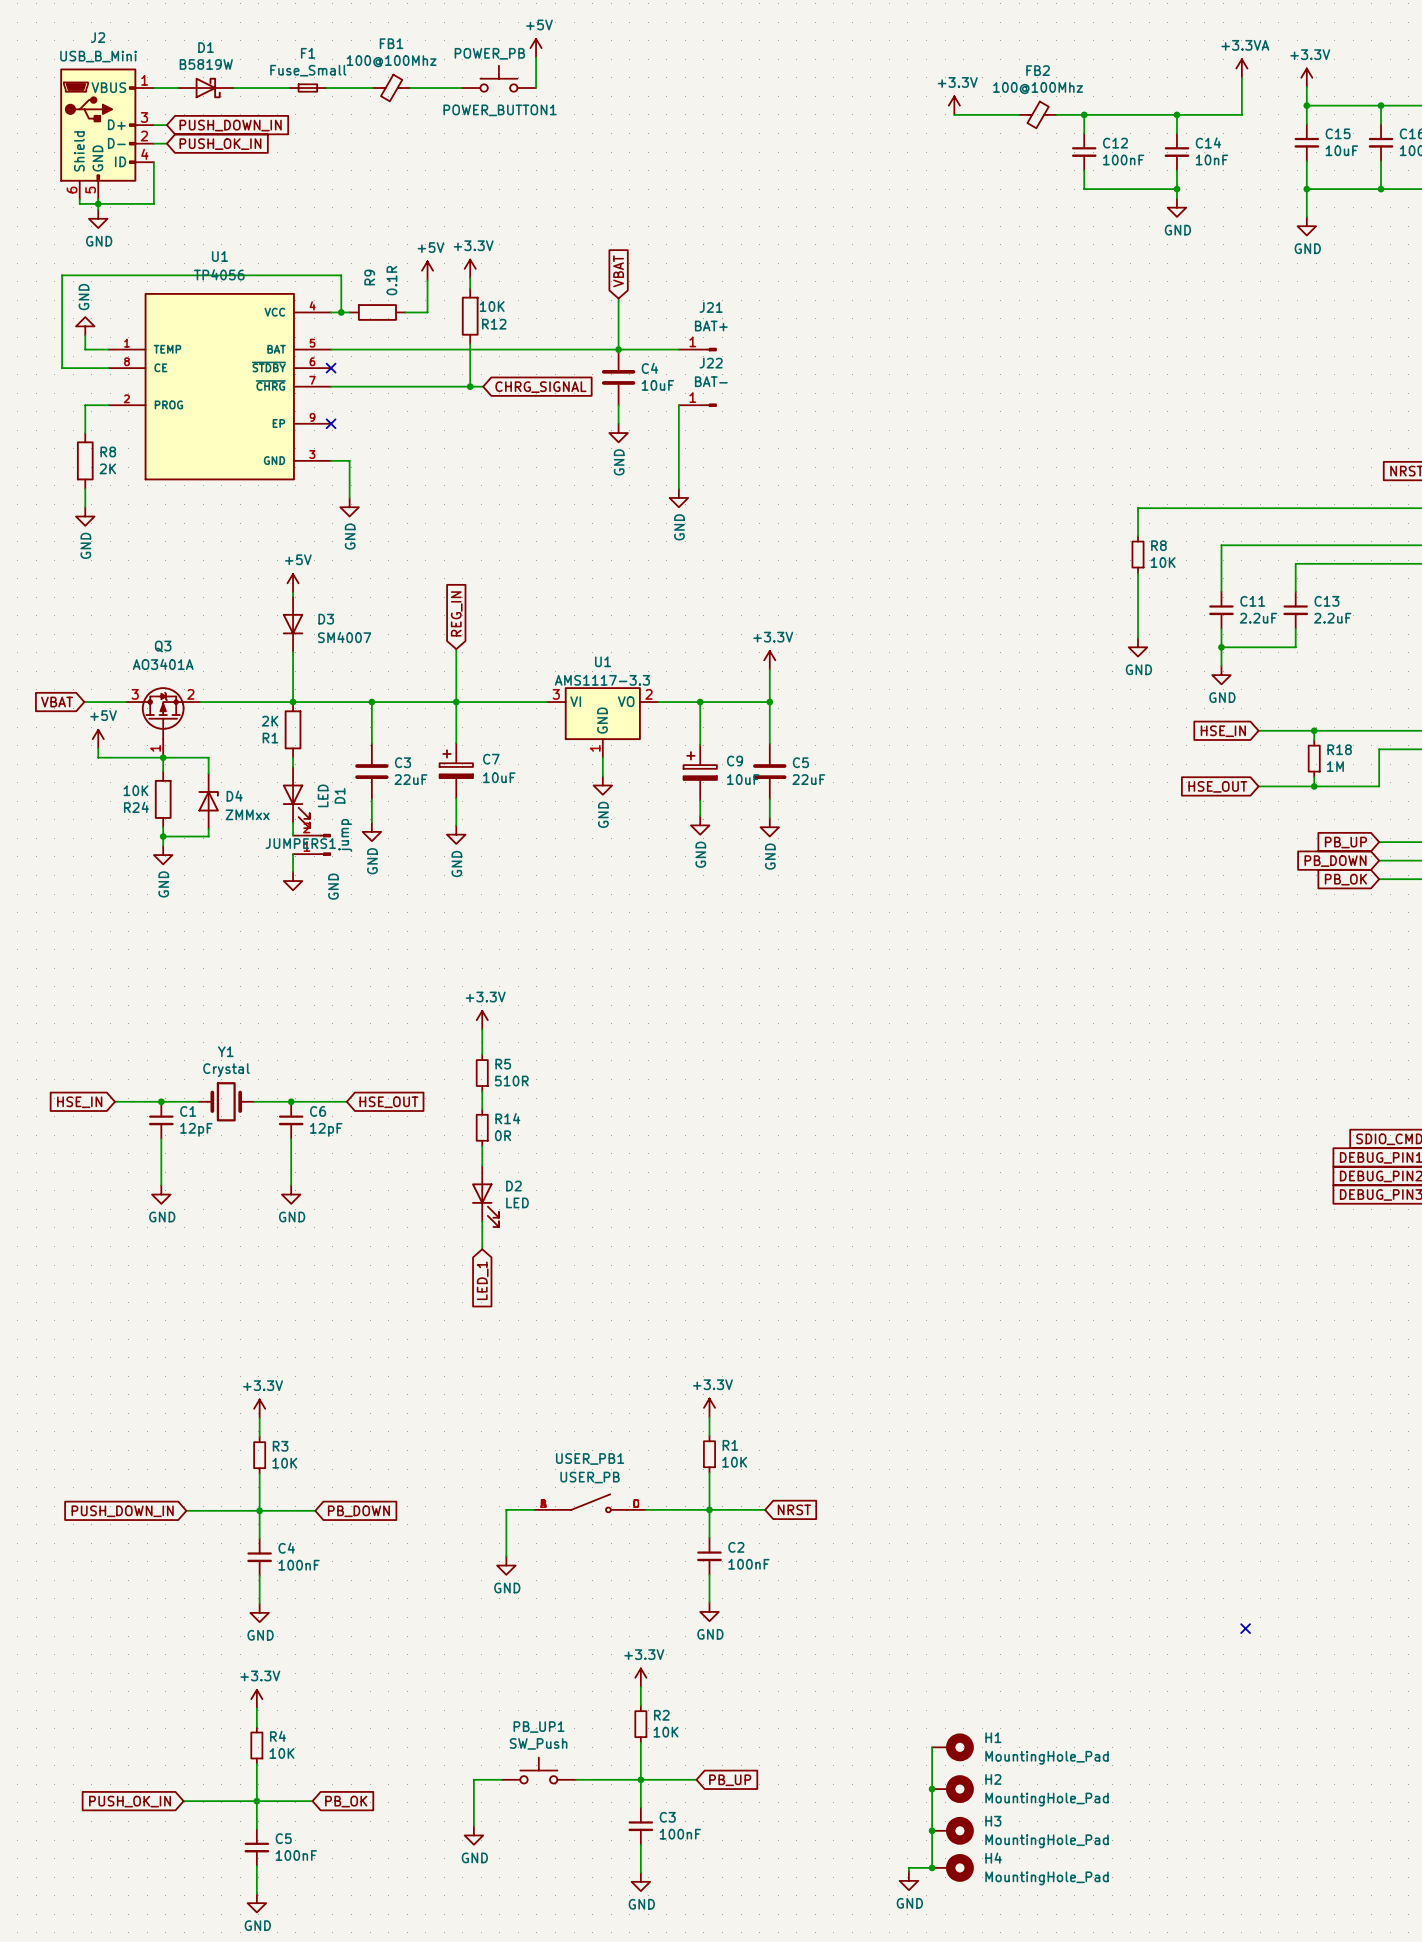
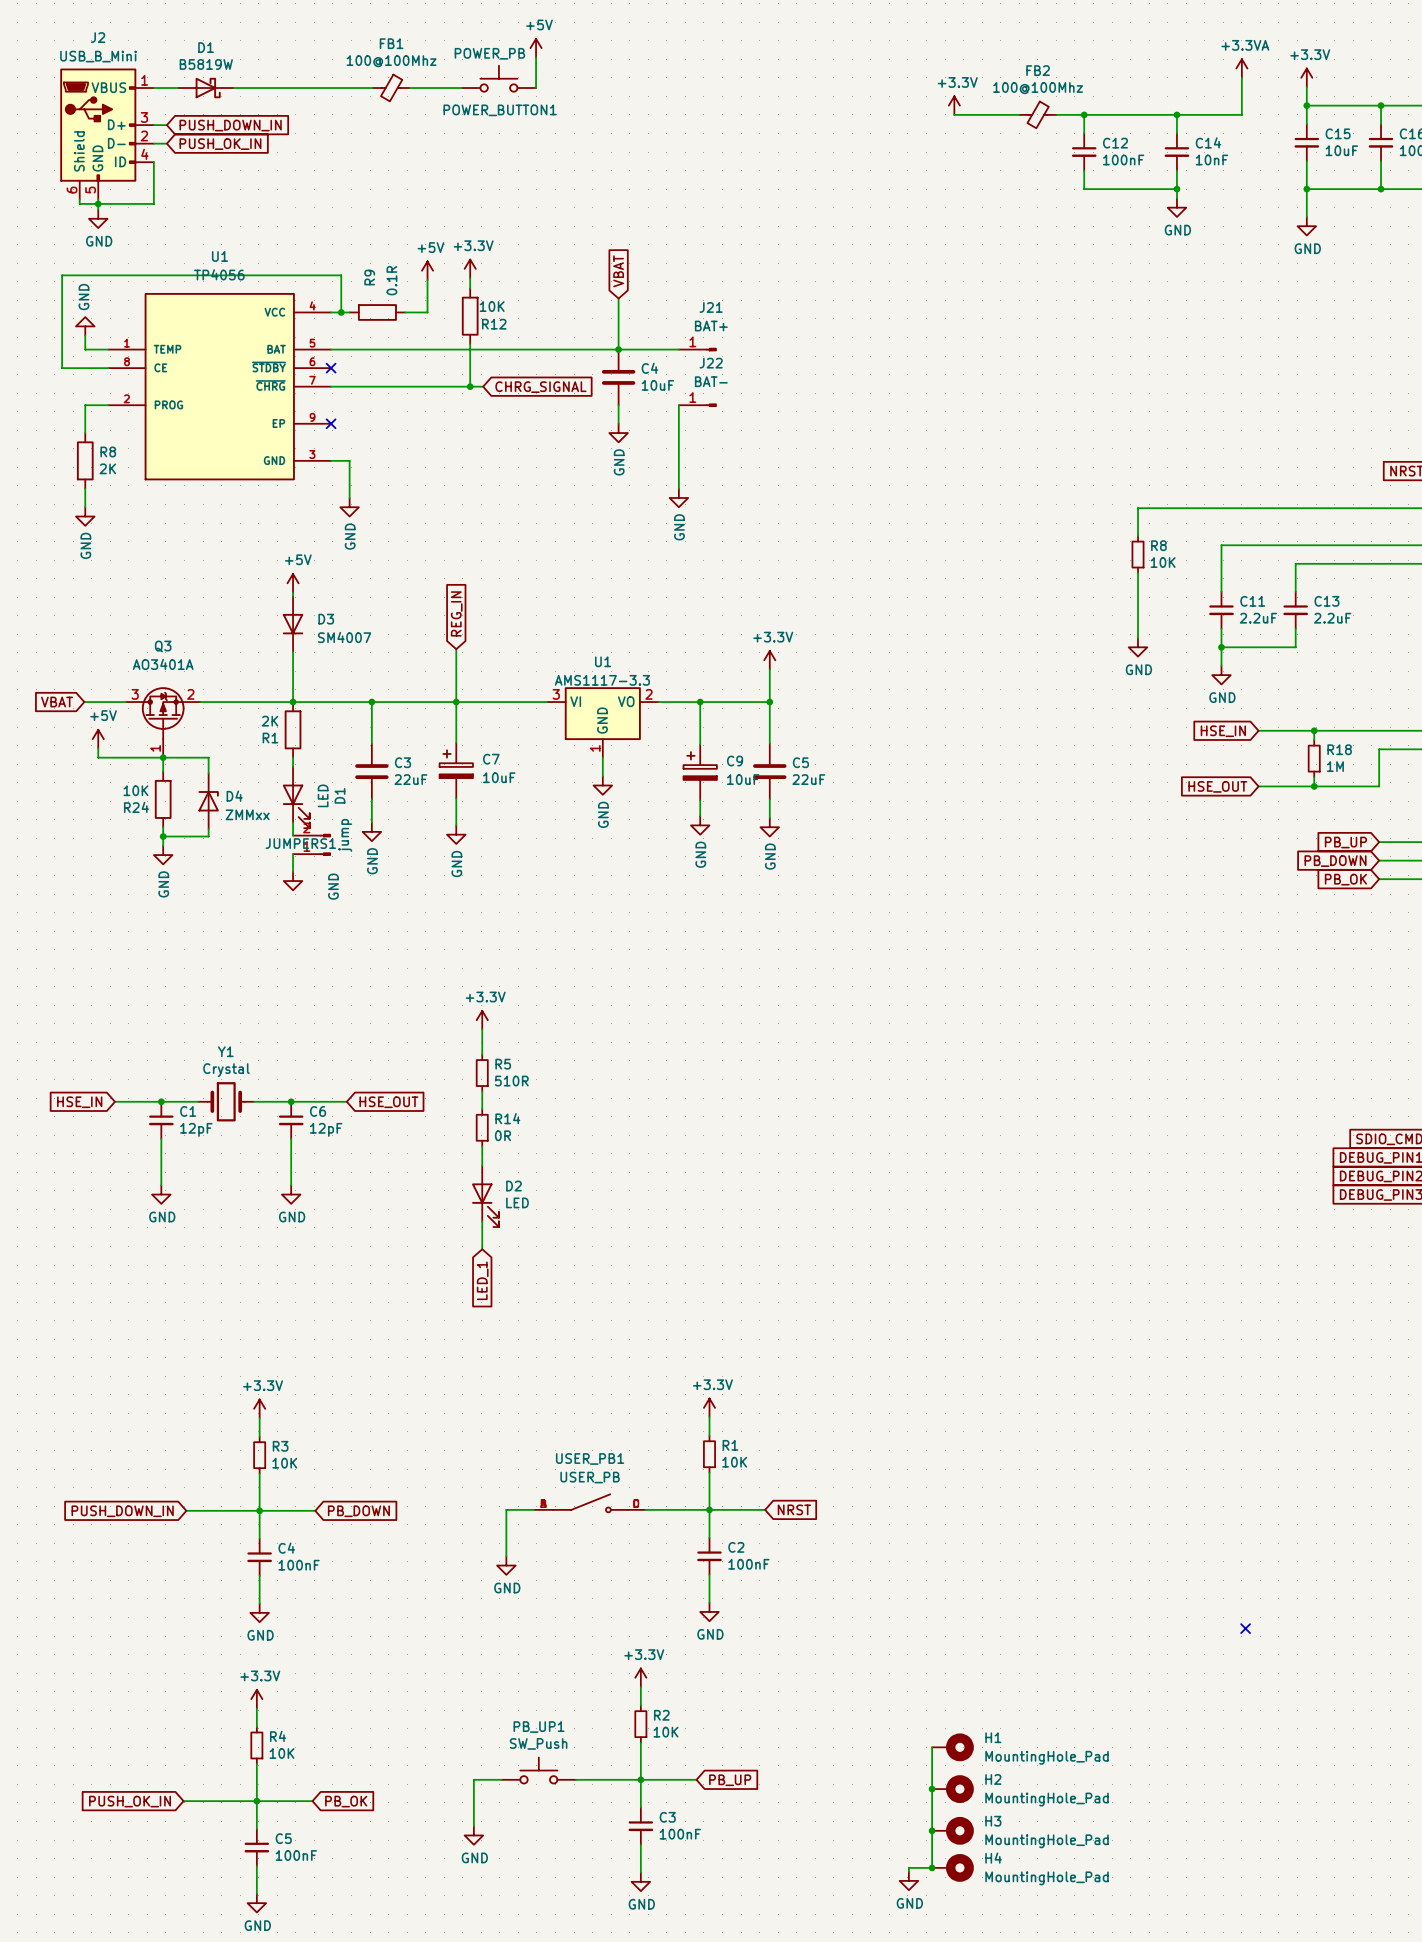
F1: Fuse_Small (307, 88) -> none

